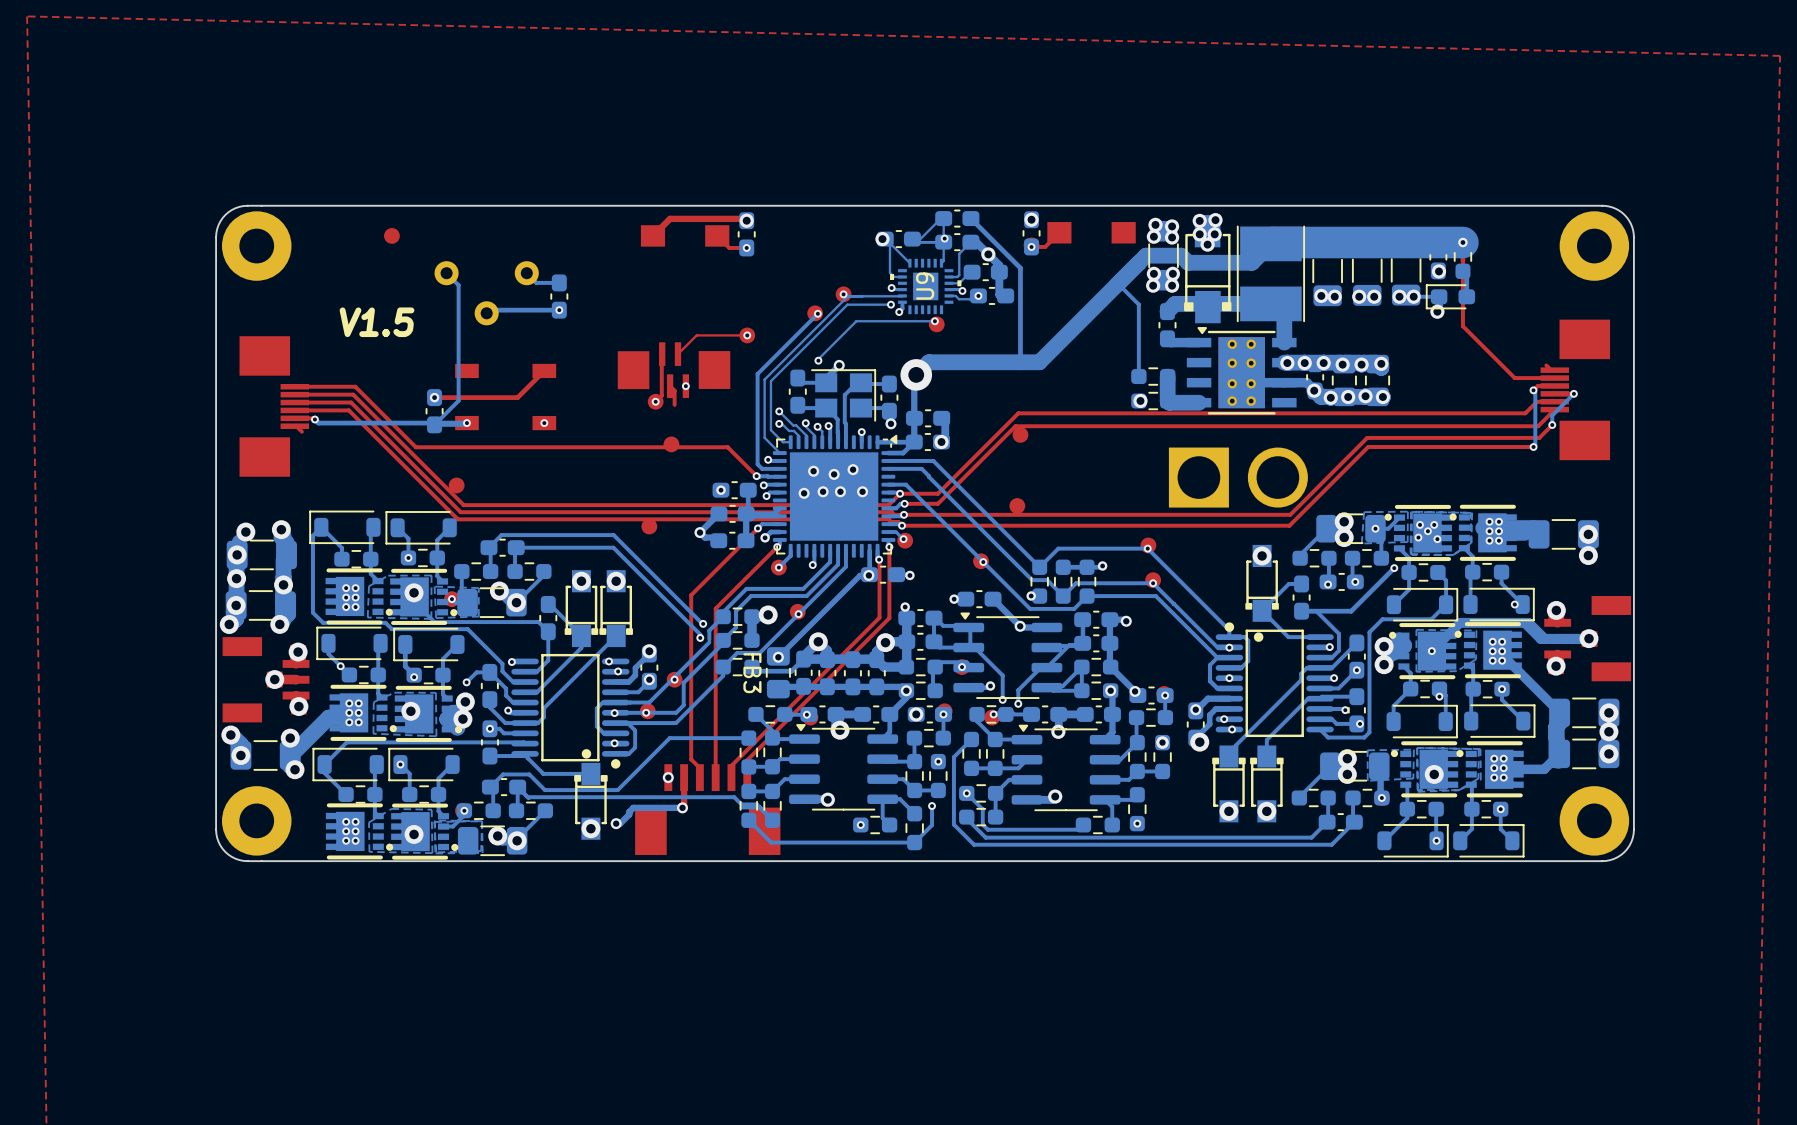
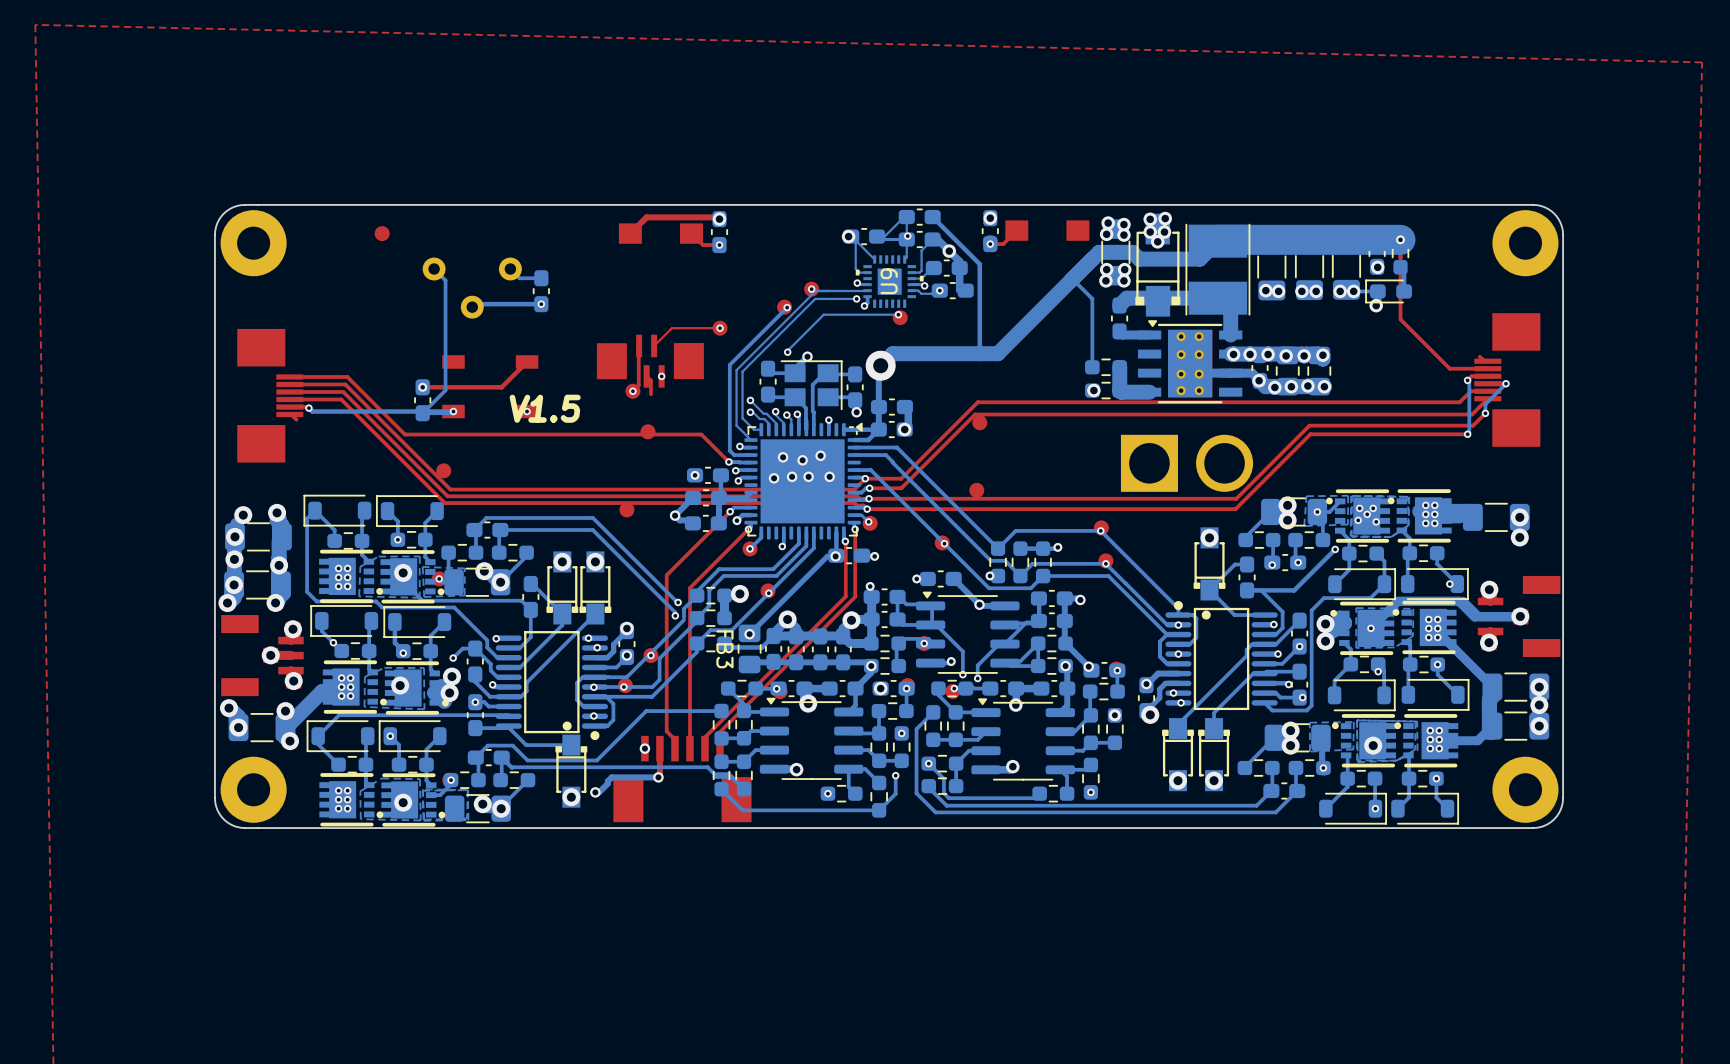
text position: V1.5 (377, 322) -> V1.5 (545, 408)

